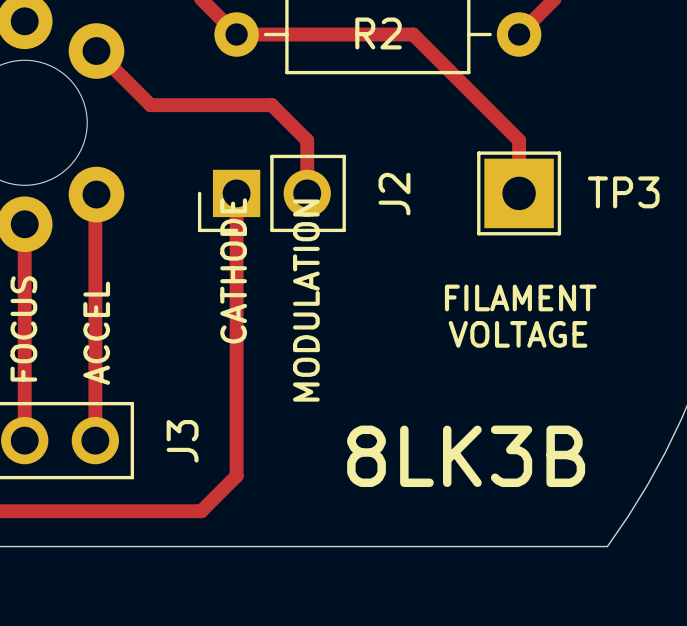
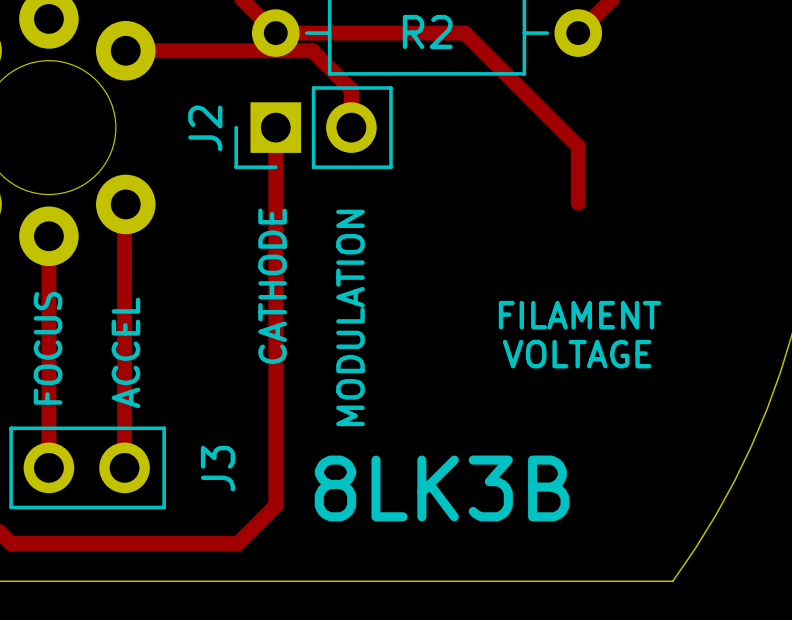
top track: (96, 51) (150, 105) (271, 105) (307, 140) (307, 193) -> (125, 50) (312, 50) (351, 89) (351, 127)
top track: none -> (275, 127) (275, 203)
J2 position: (271, 193) -> (313, 127)
TP3: (519, 193) -> none
J2 name position: J2 (394, 194) -> J2 (205, 128)
text position: 8LK3B (466, 456) -> 8LK3B (442, 488)

